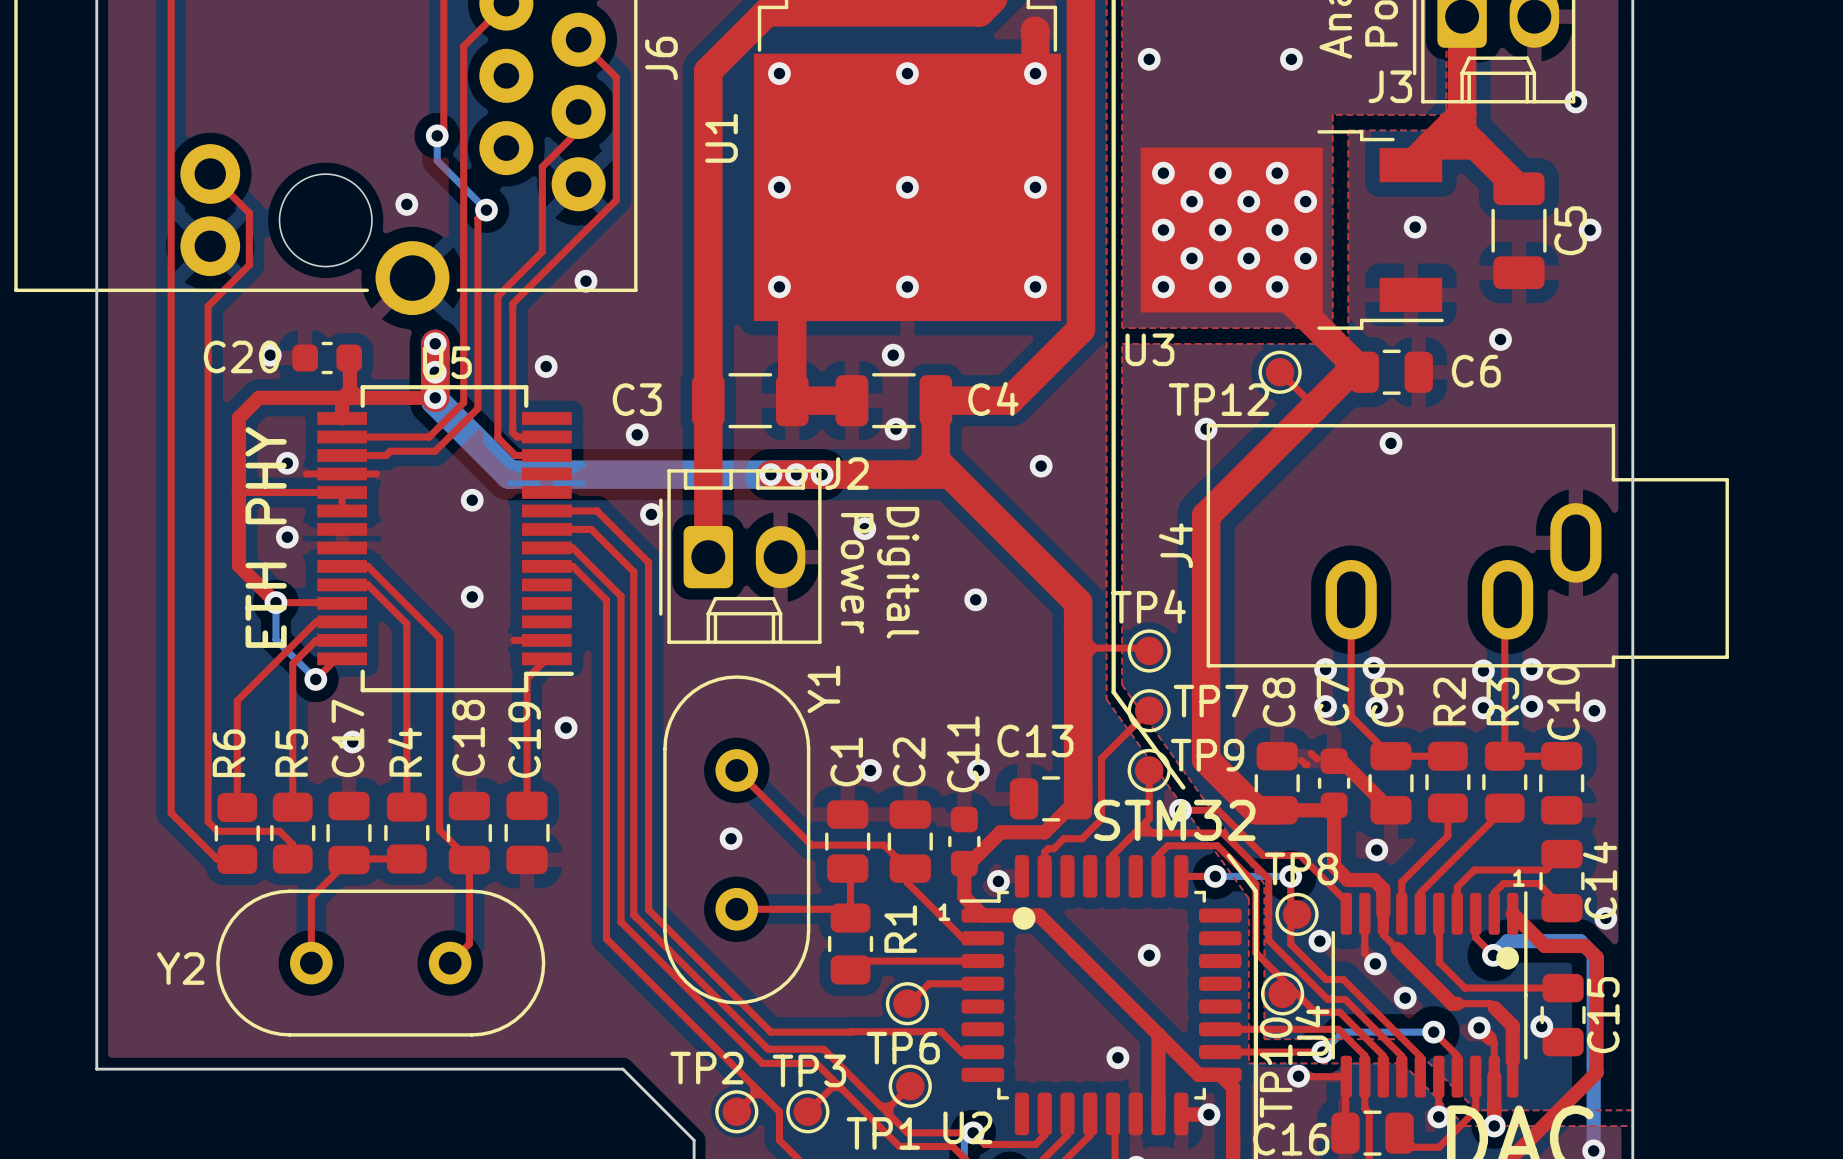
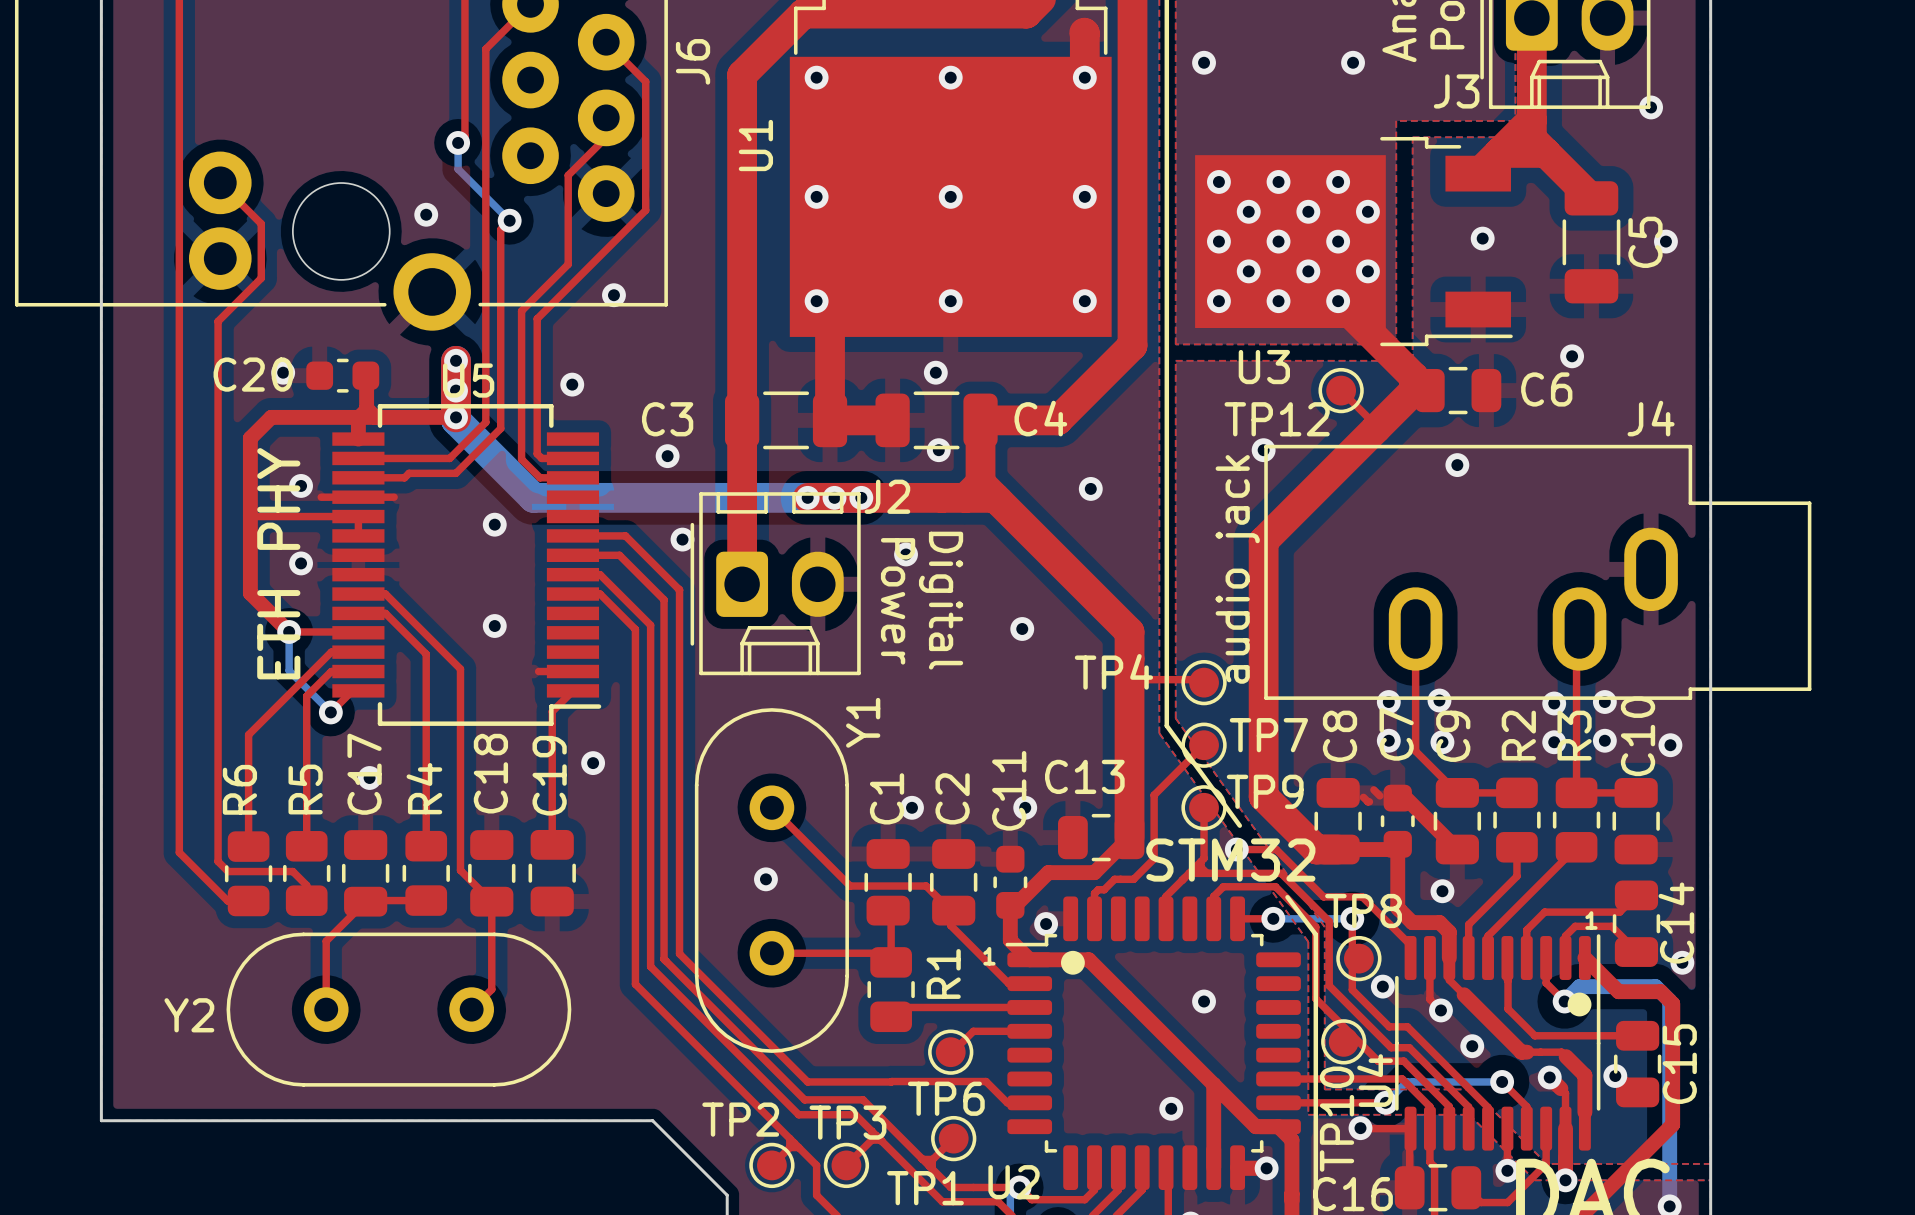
U3 name position: U3 (1149, 349) -> U3 (1264, 367)
text: none -> audio jack (1237, 569)
J4 name rotation: 0° (1175, 545) -> 90° clockwise (1651, 418)
J4 name position: J4 (1175, 545) -> J4 (1651, 418)
TP4 name position: TP4 (1148, 606) -> TP4 (1113, 671)

